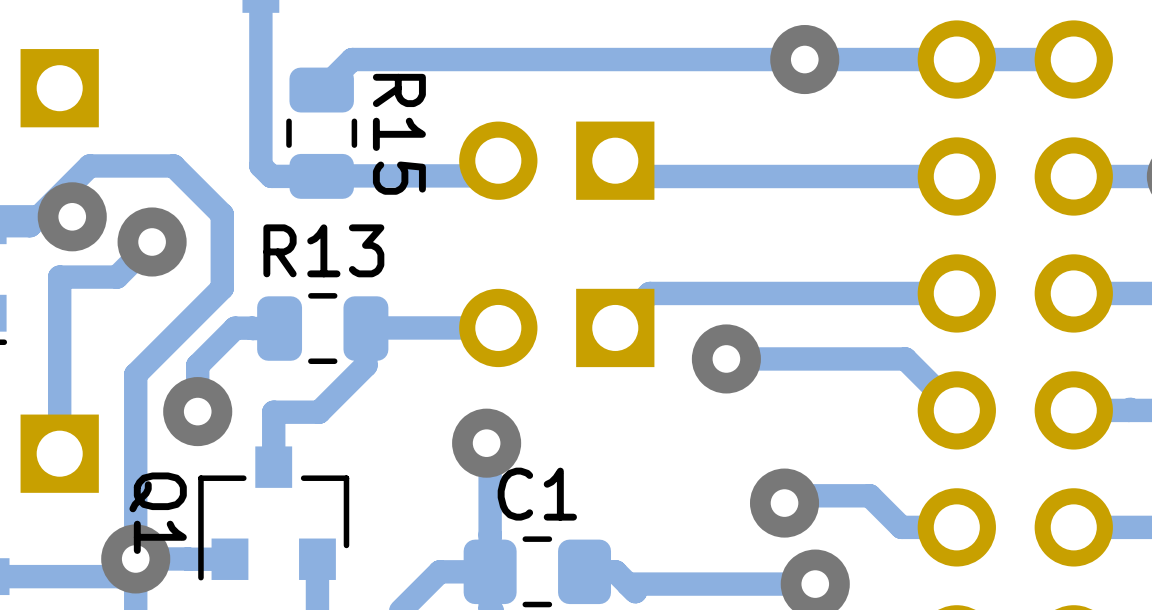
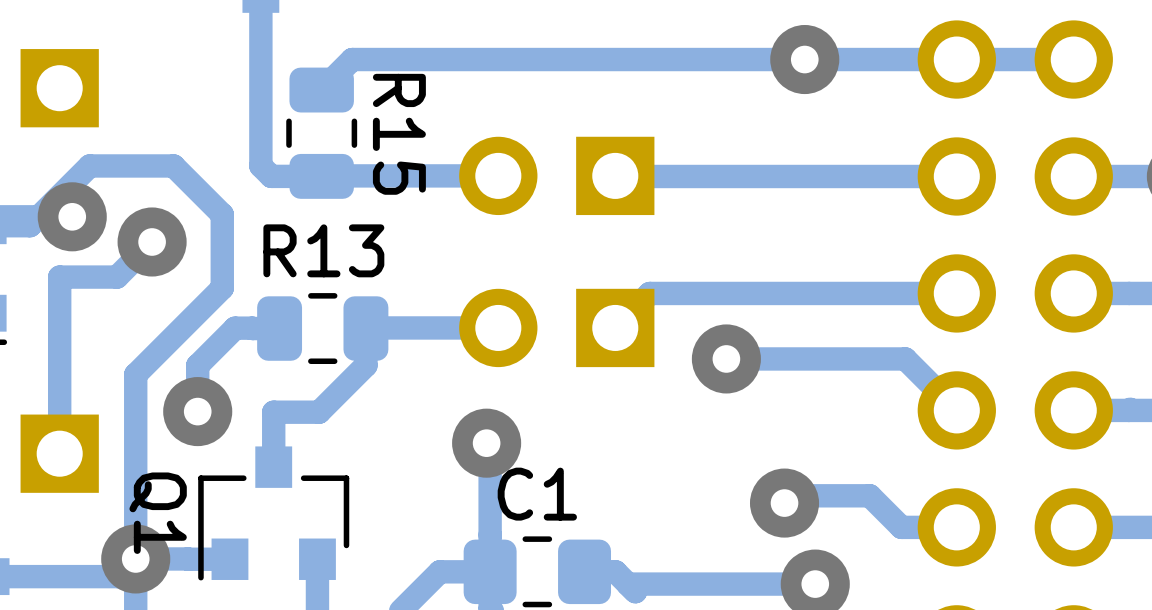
part position: (556, 160) -> (556, 175)

